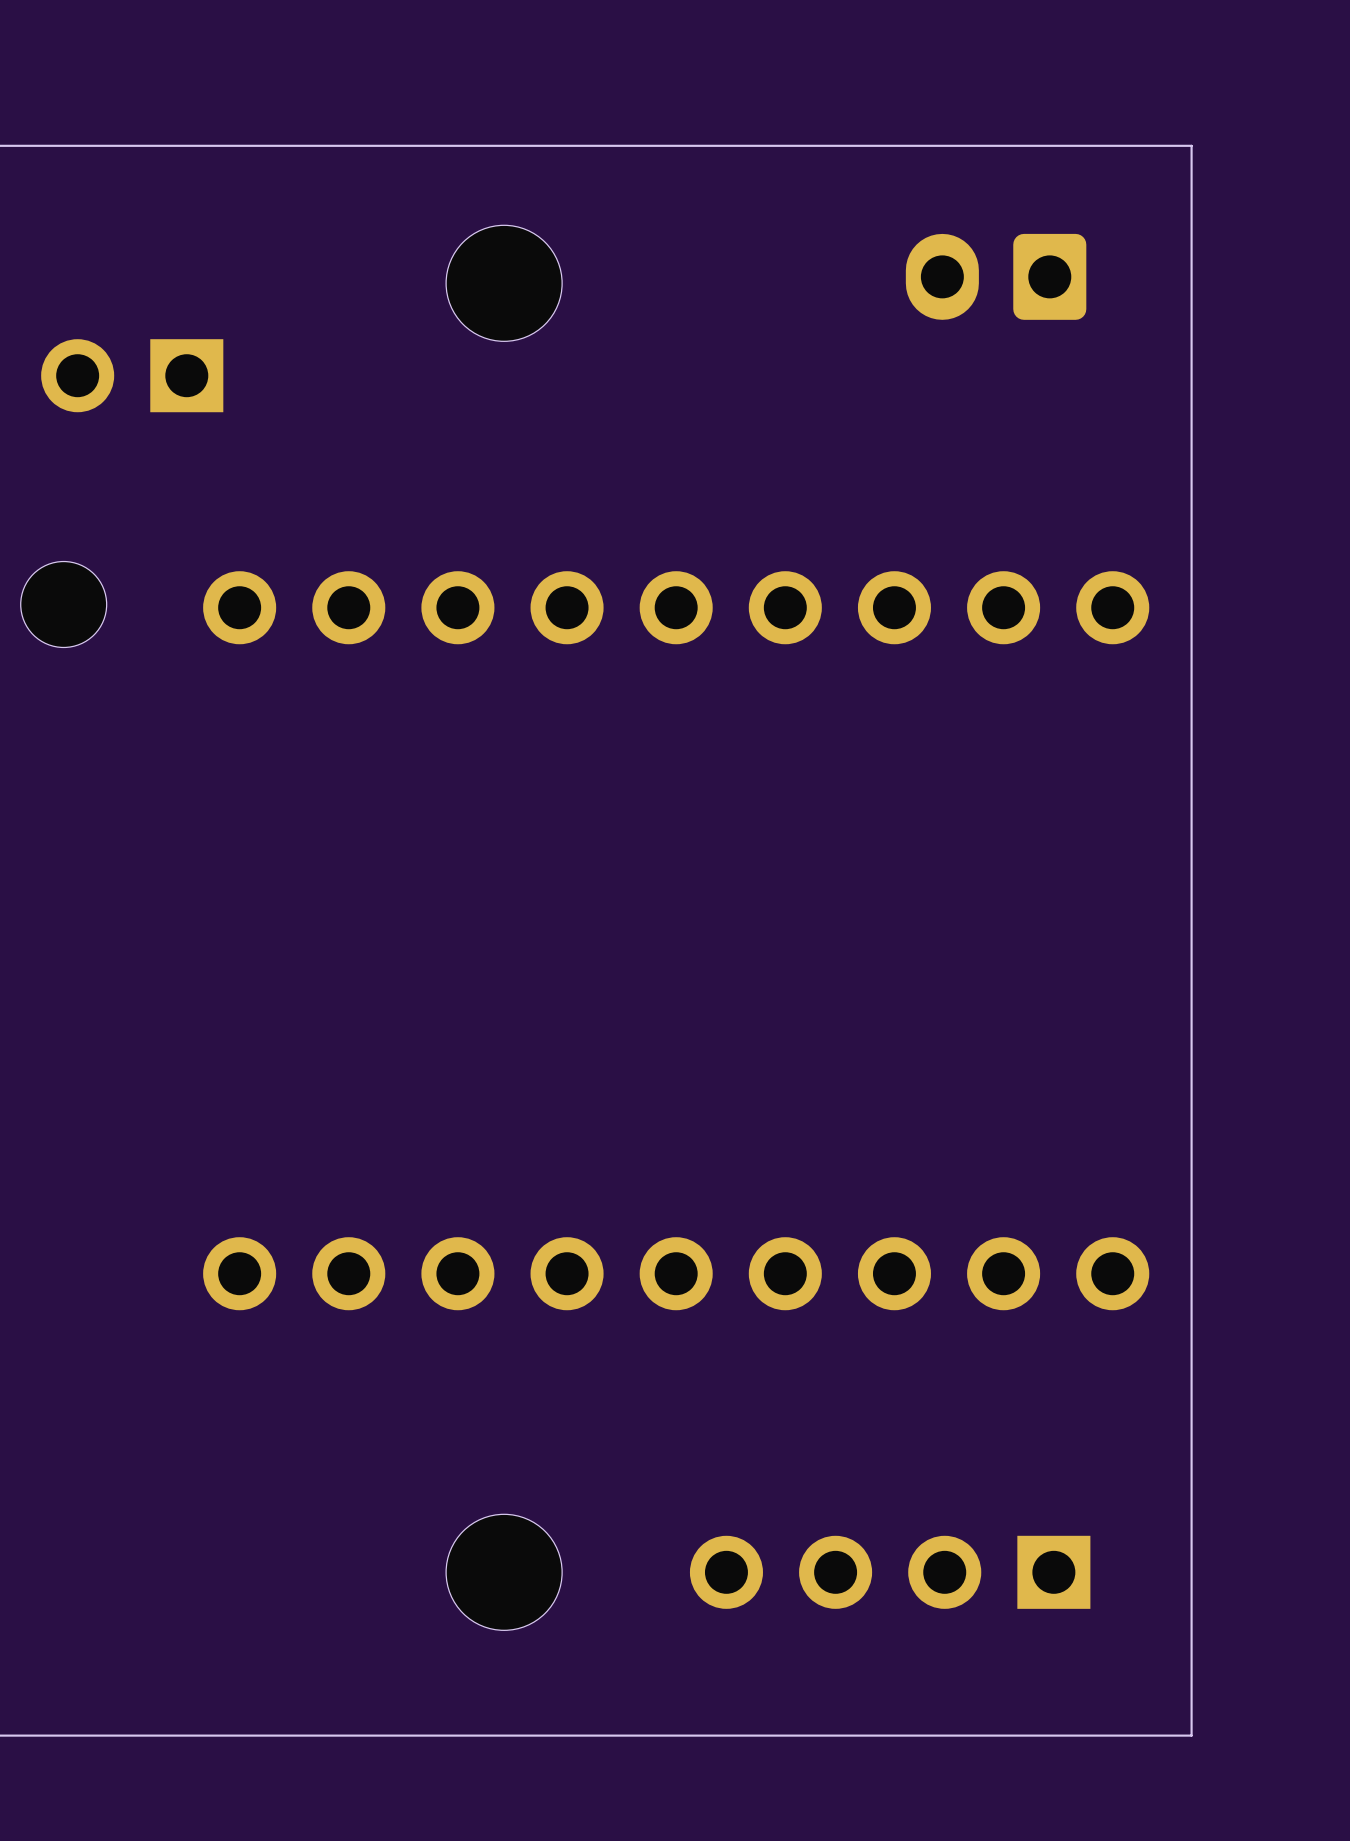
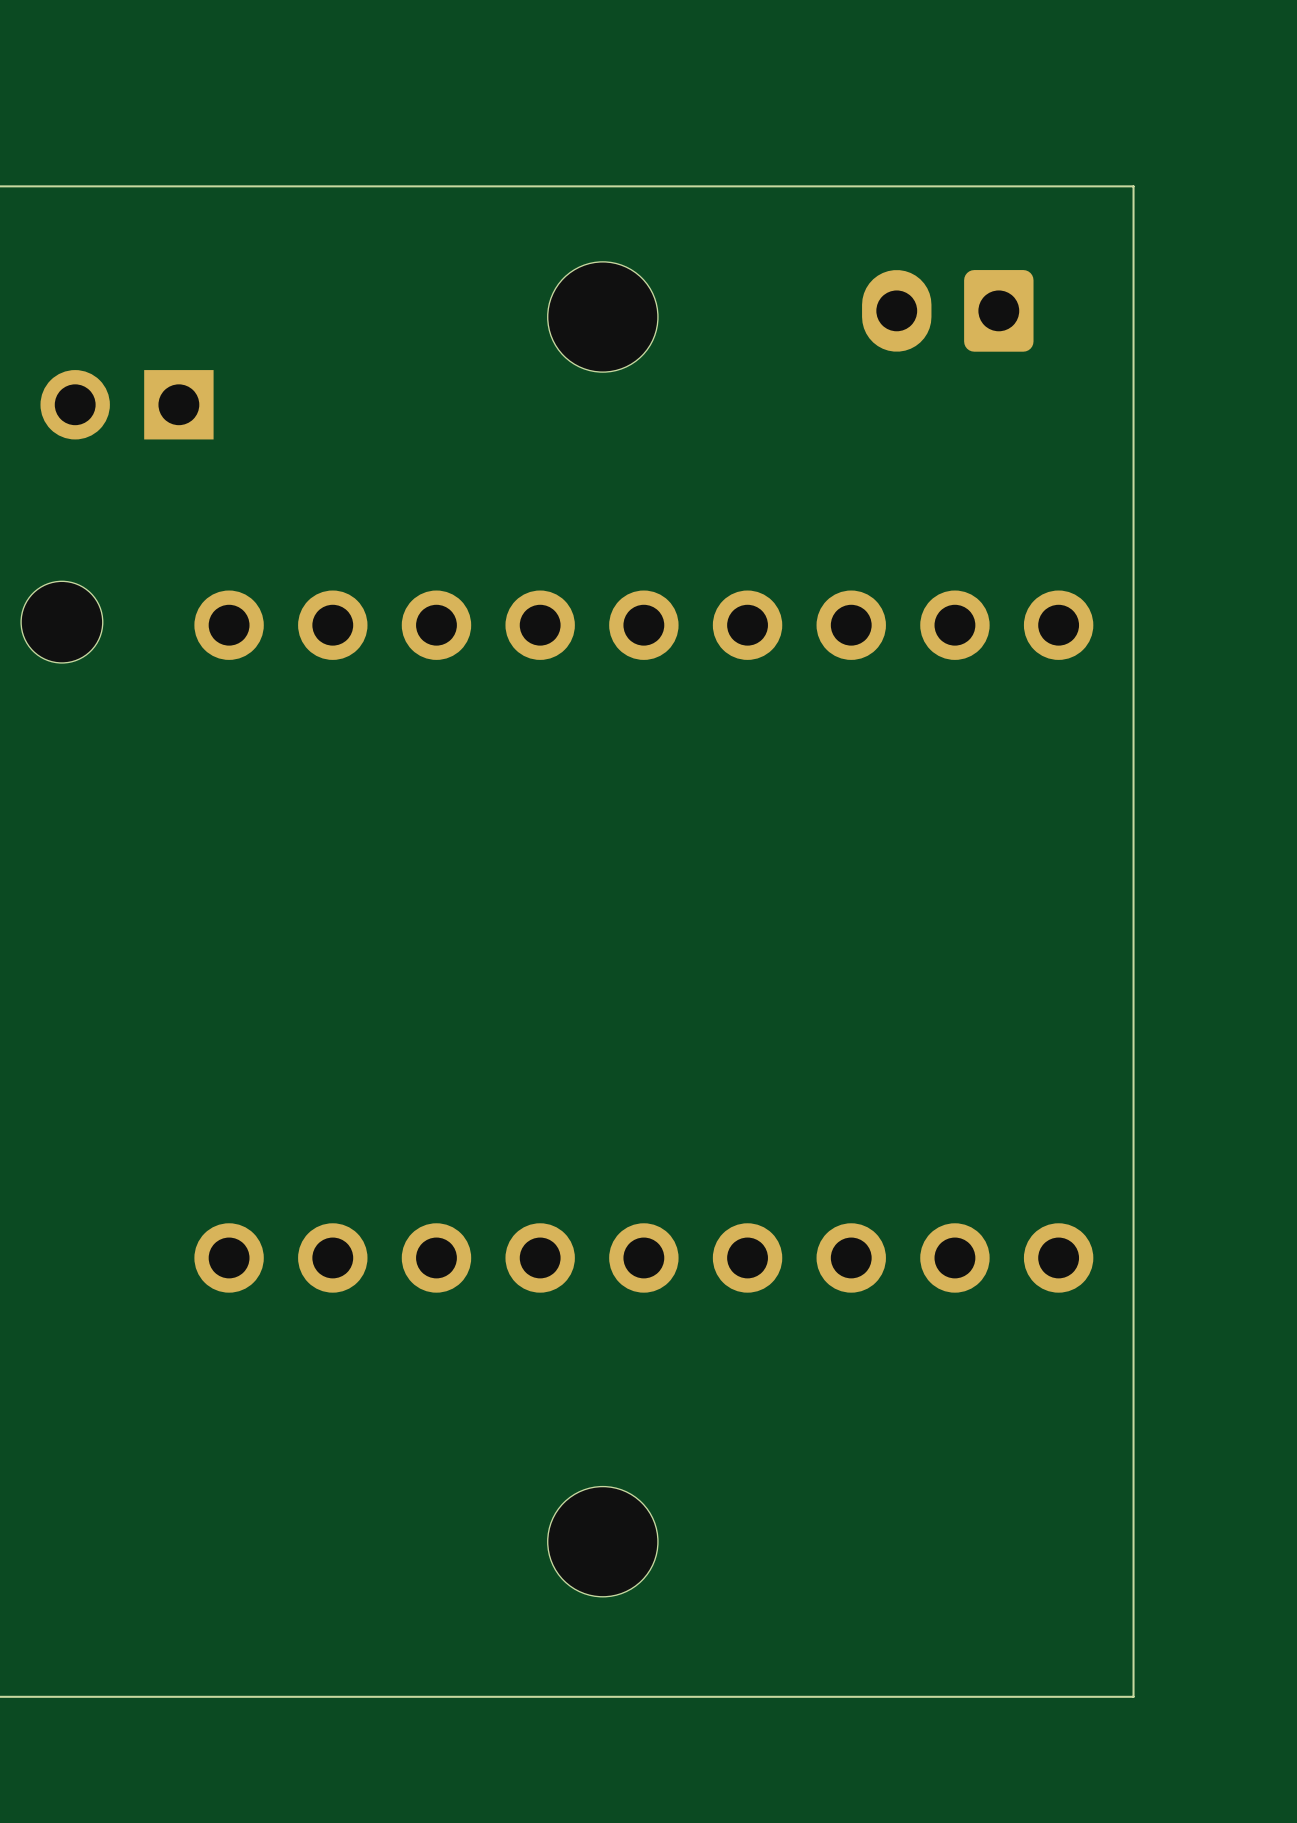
part position: (504, 283) -> (602, 316)
part position: (504, 1572) -> (602, 1541)
part: (890, 1572) -> none

